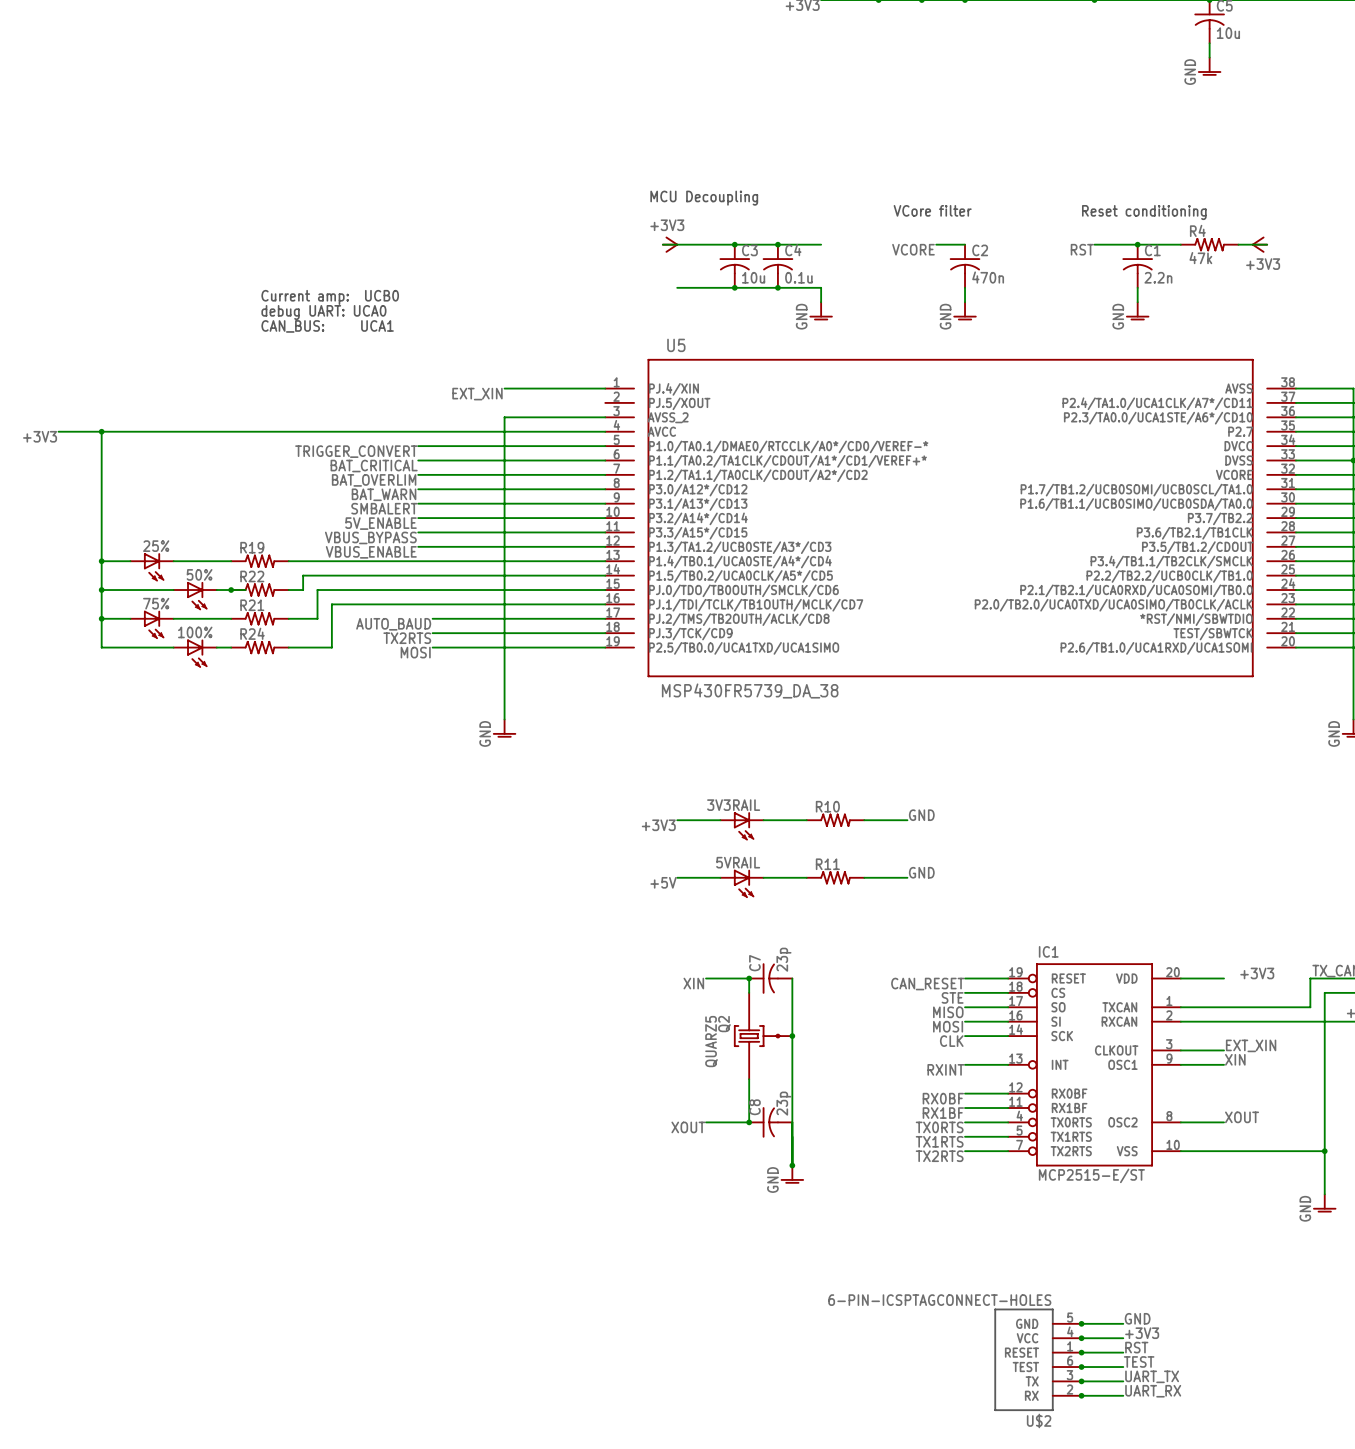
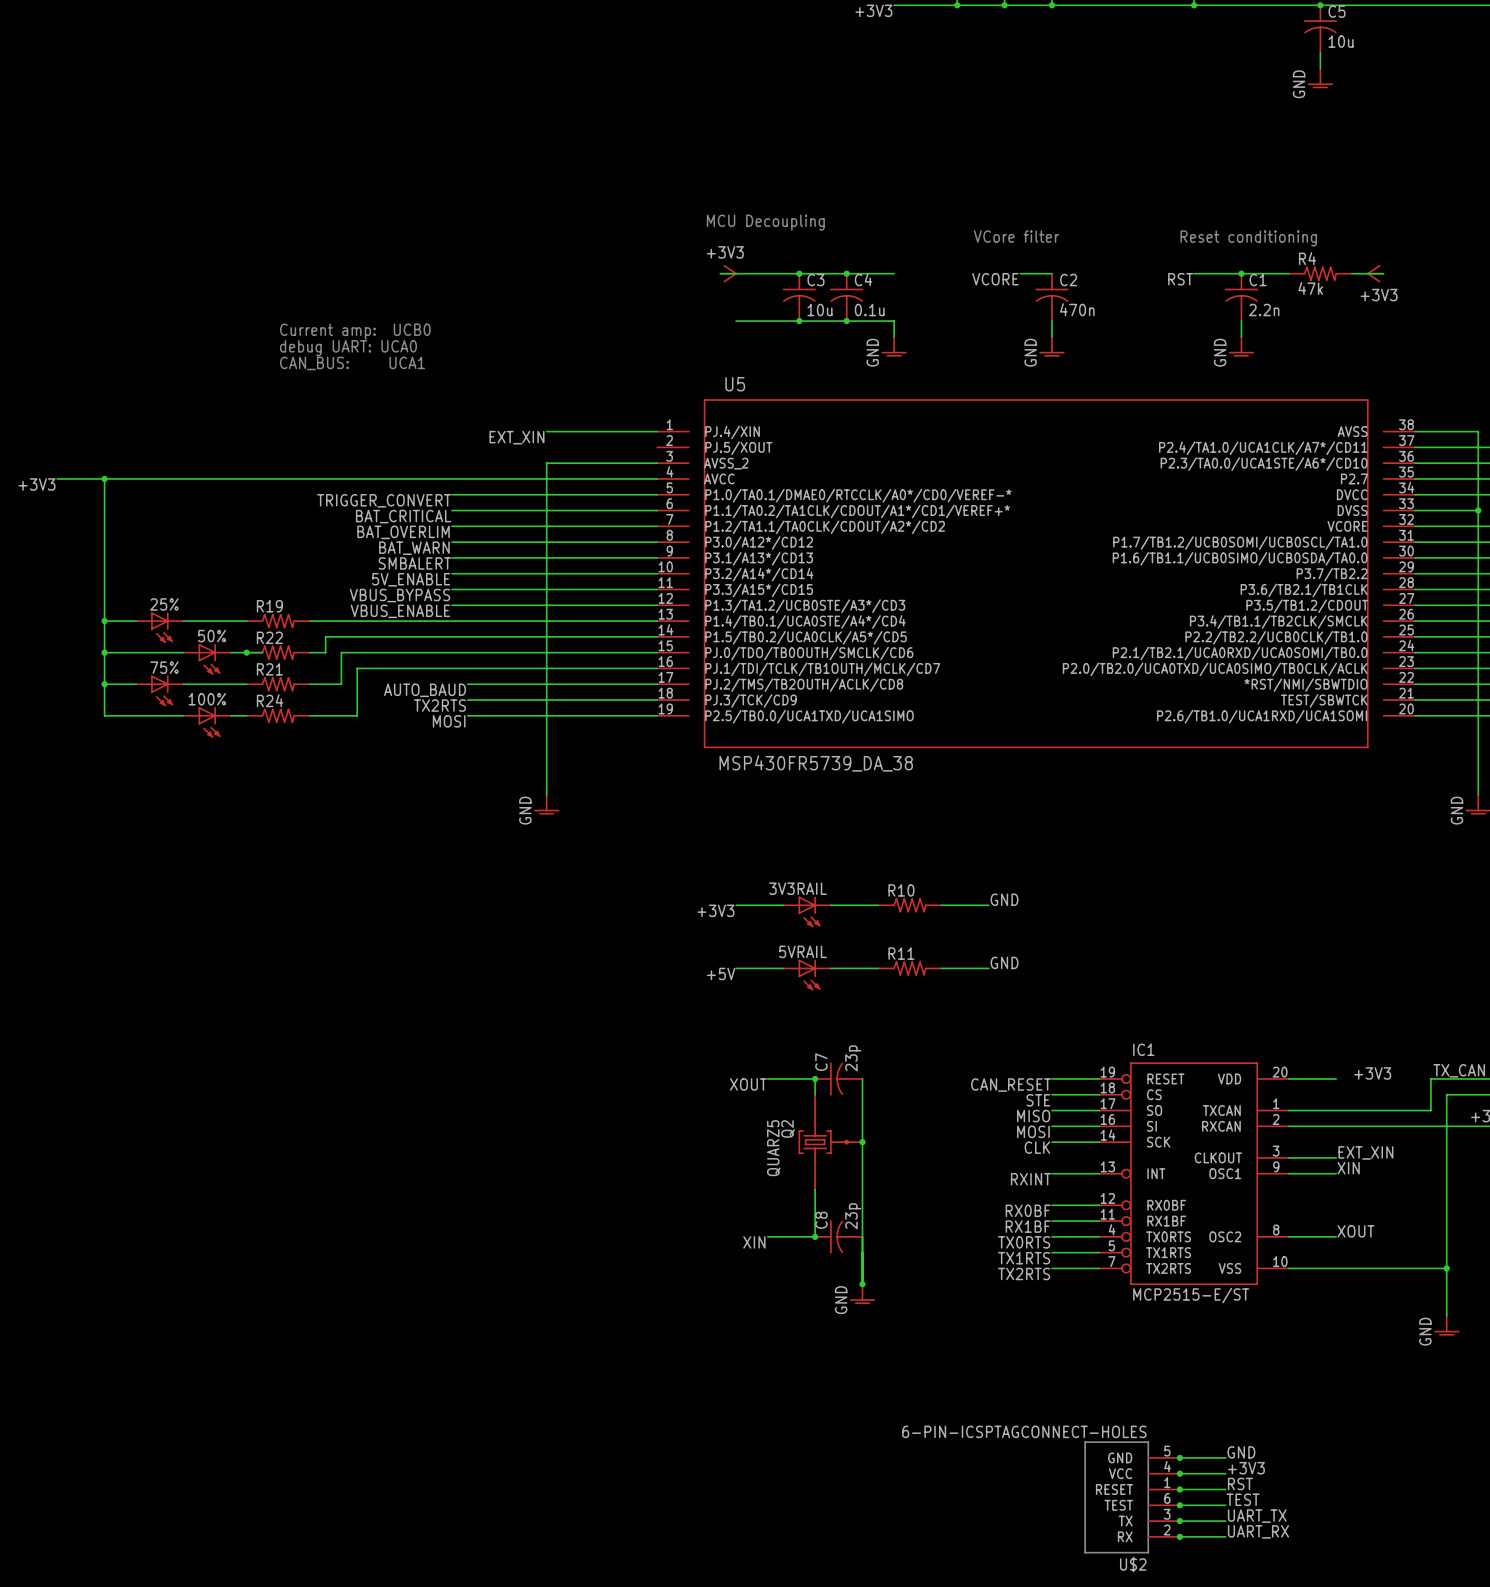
label: XIN (693, 983) -> XOUT (748, 1084)
label: XOUT (688, 1127) -> XIN (754, 1242)

